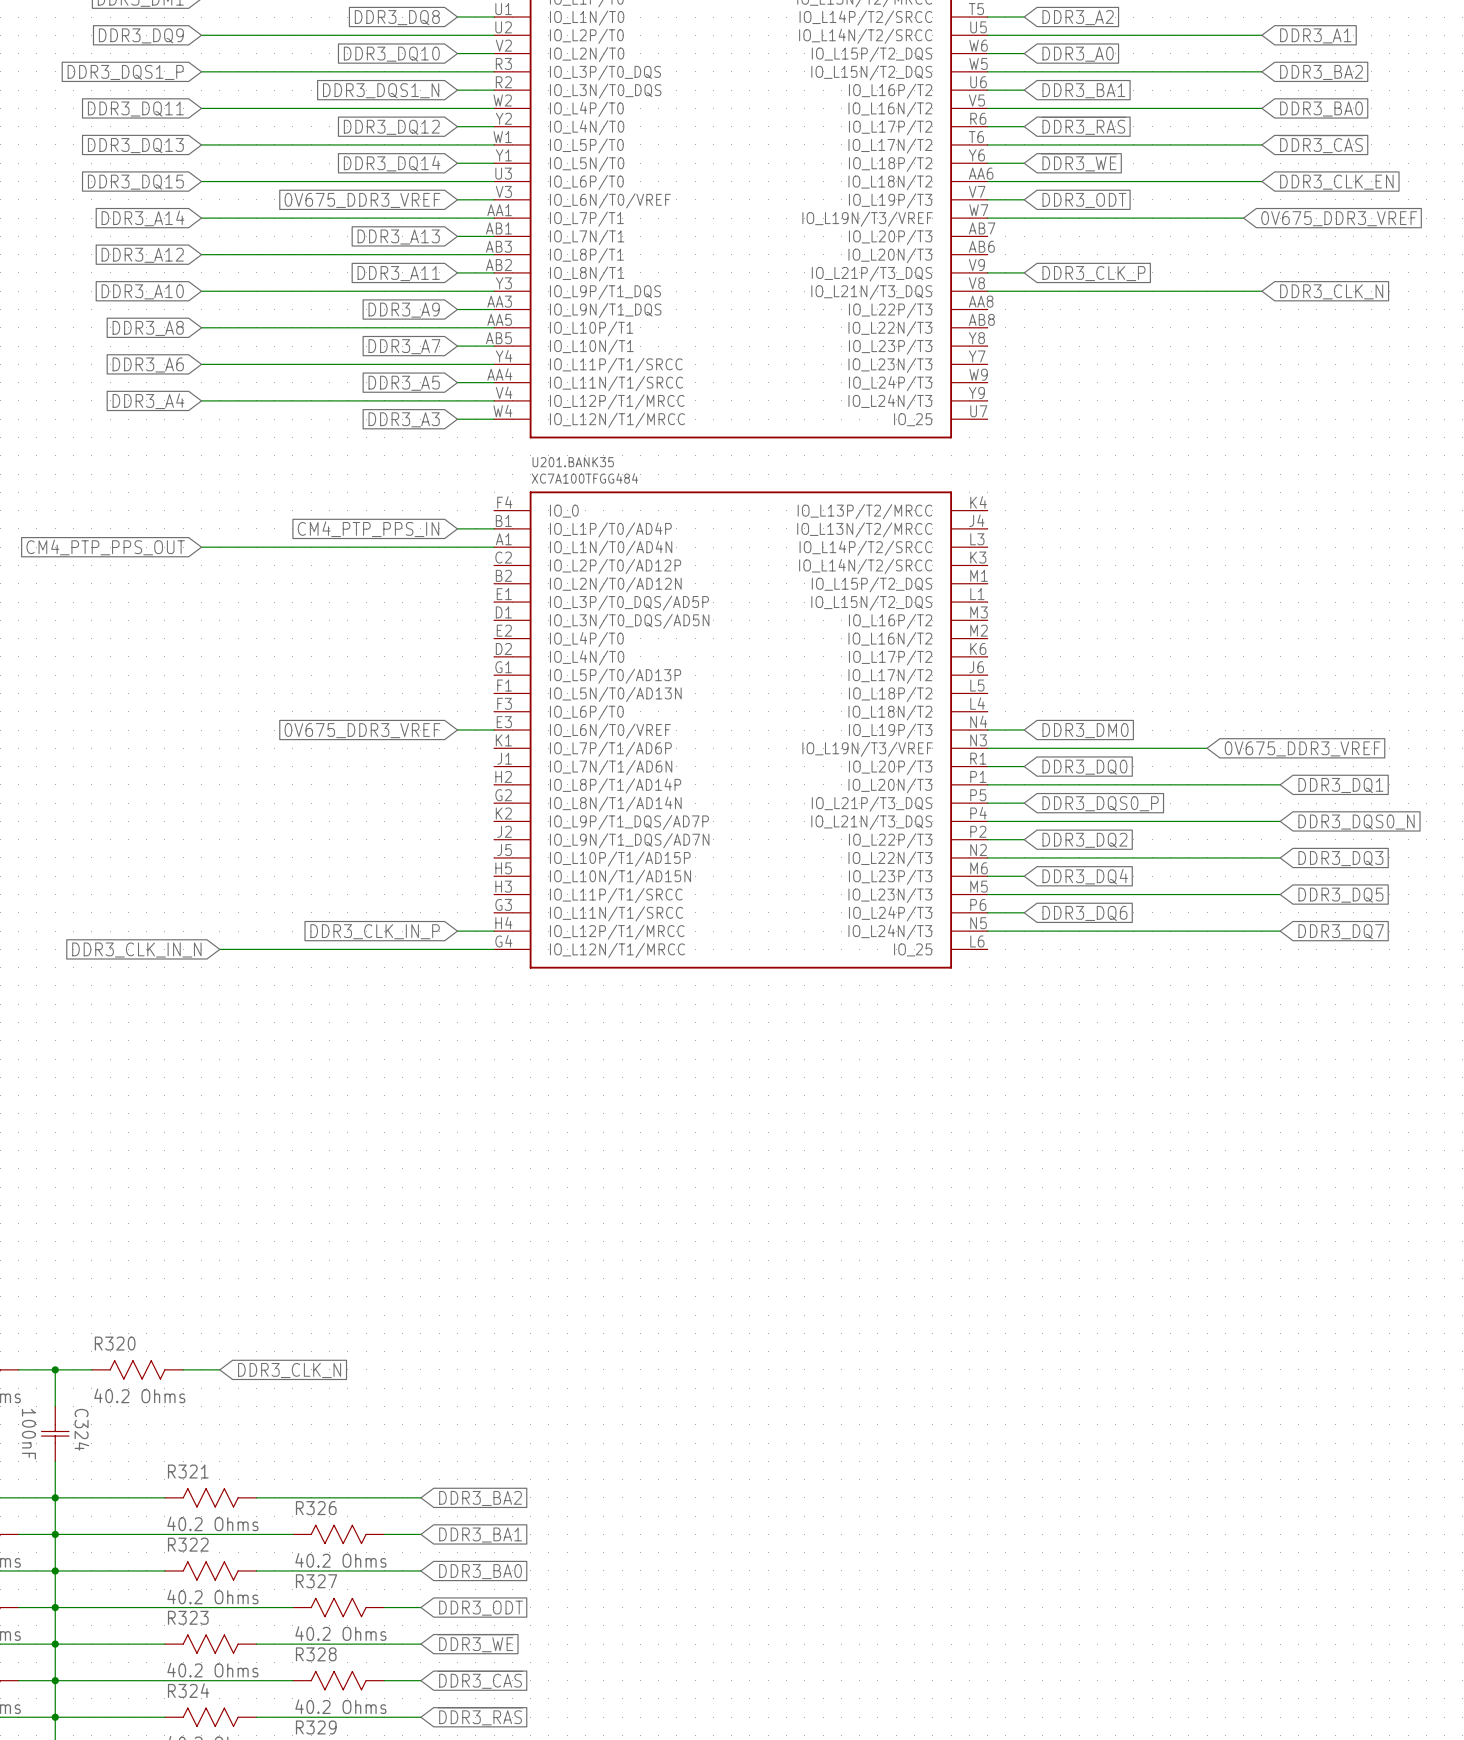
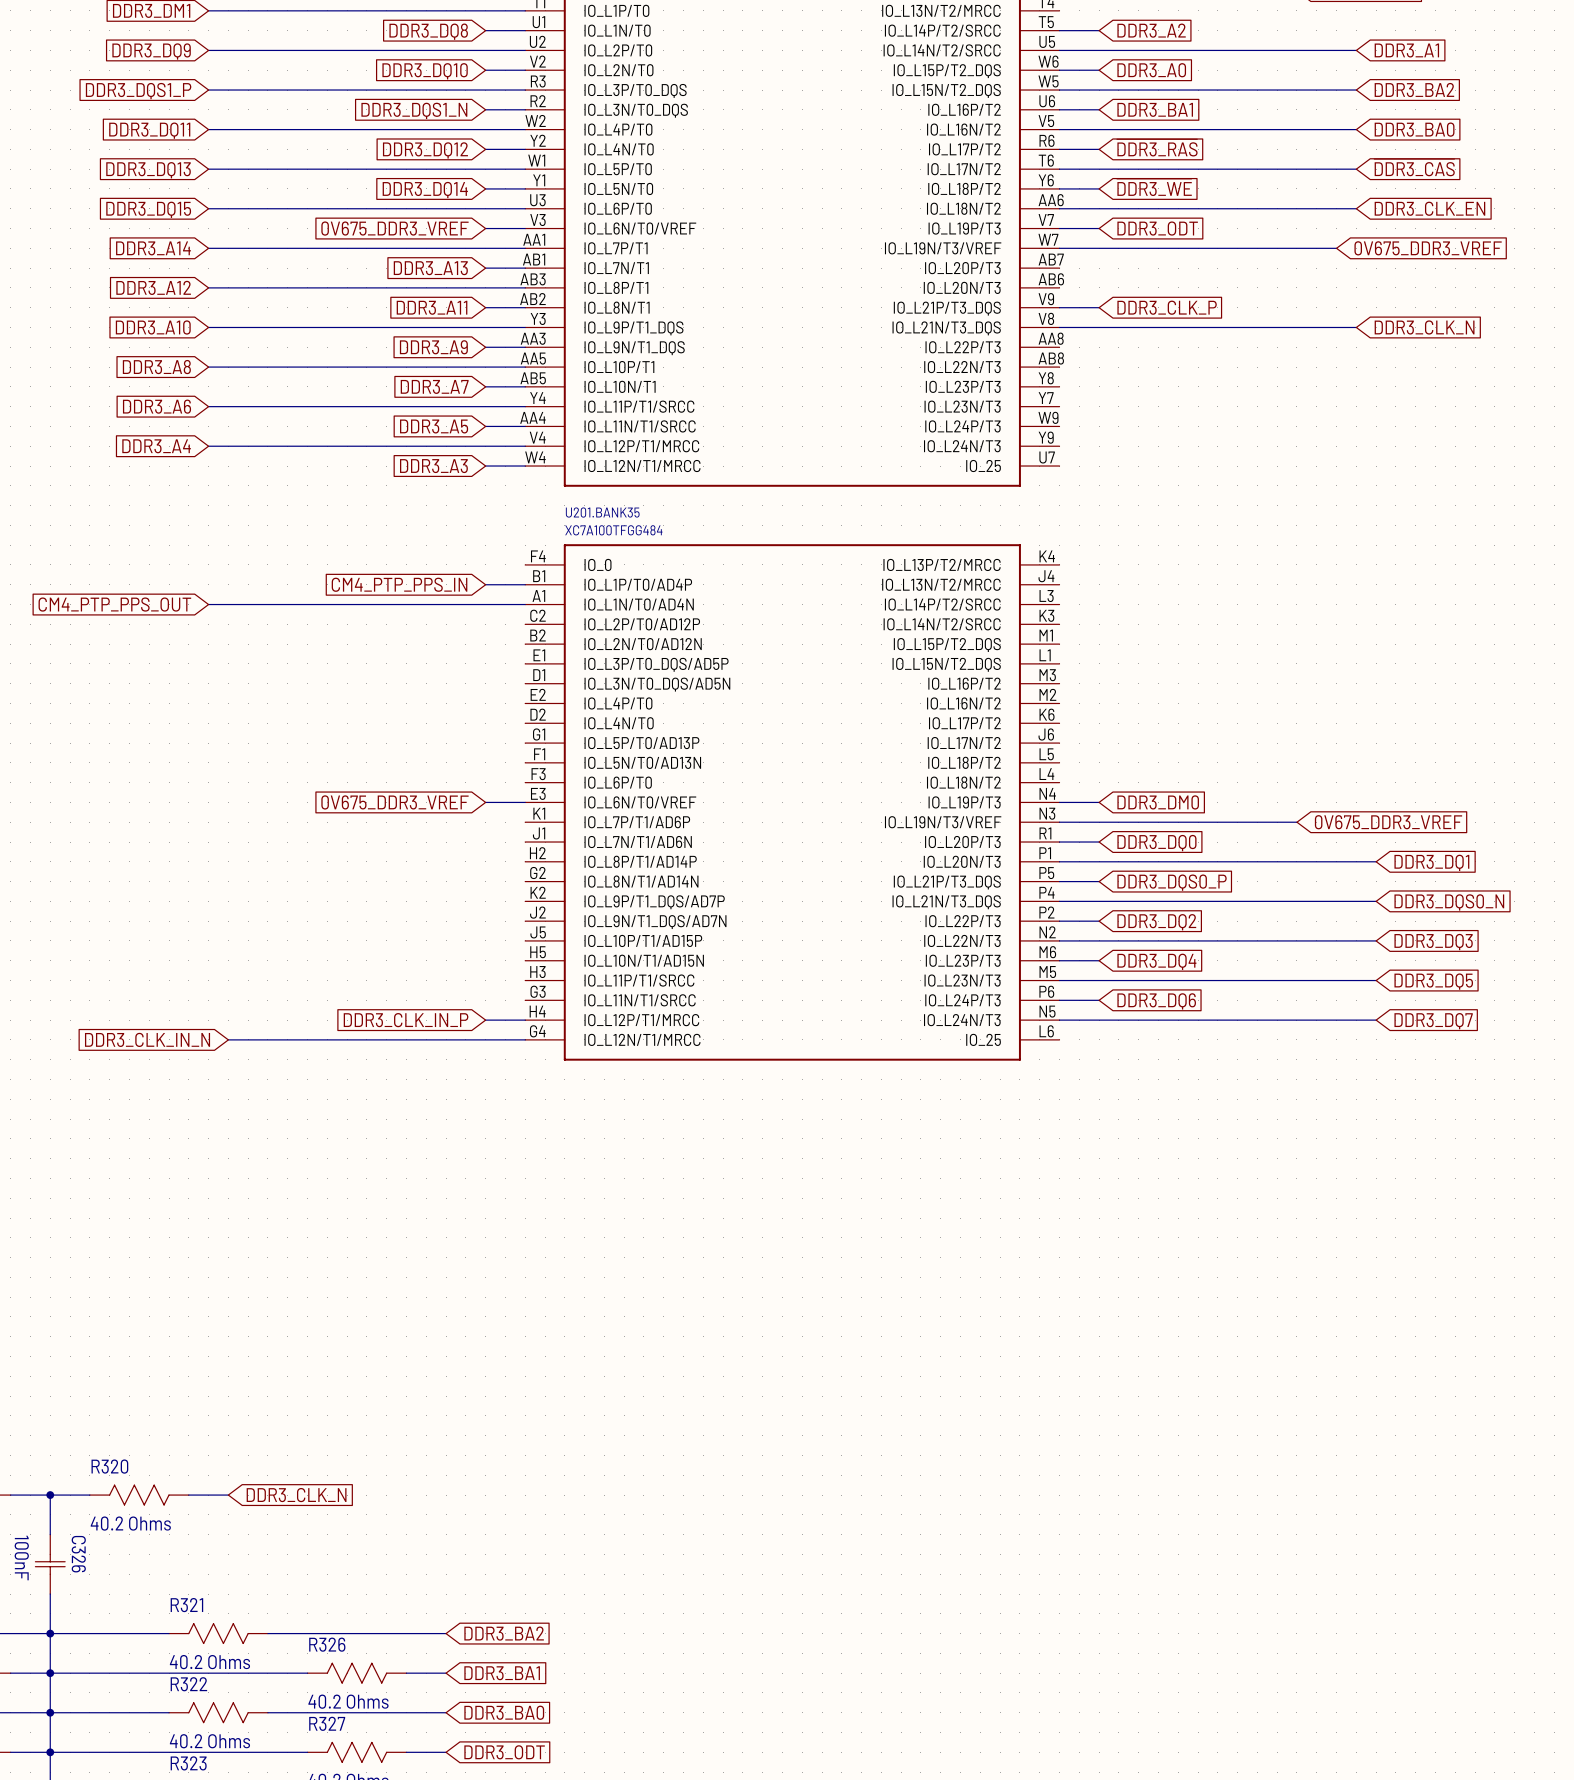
C324 name: C324 (81, 1429) -> C326 (78, 1554)

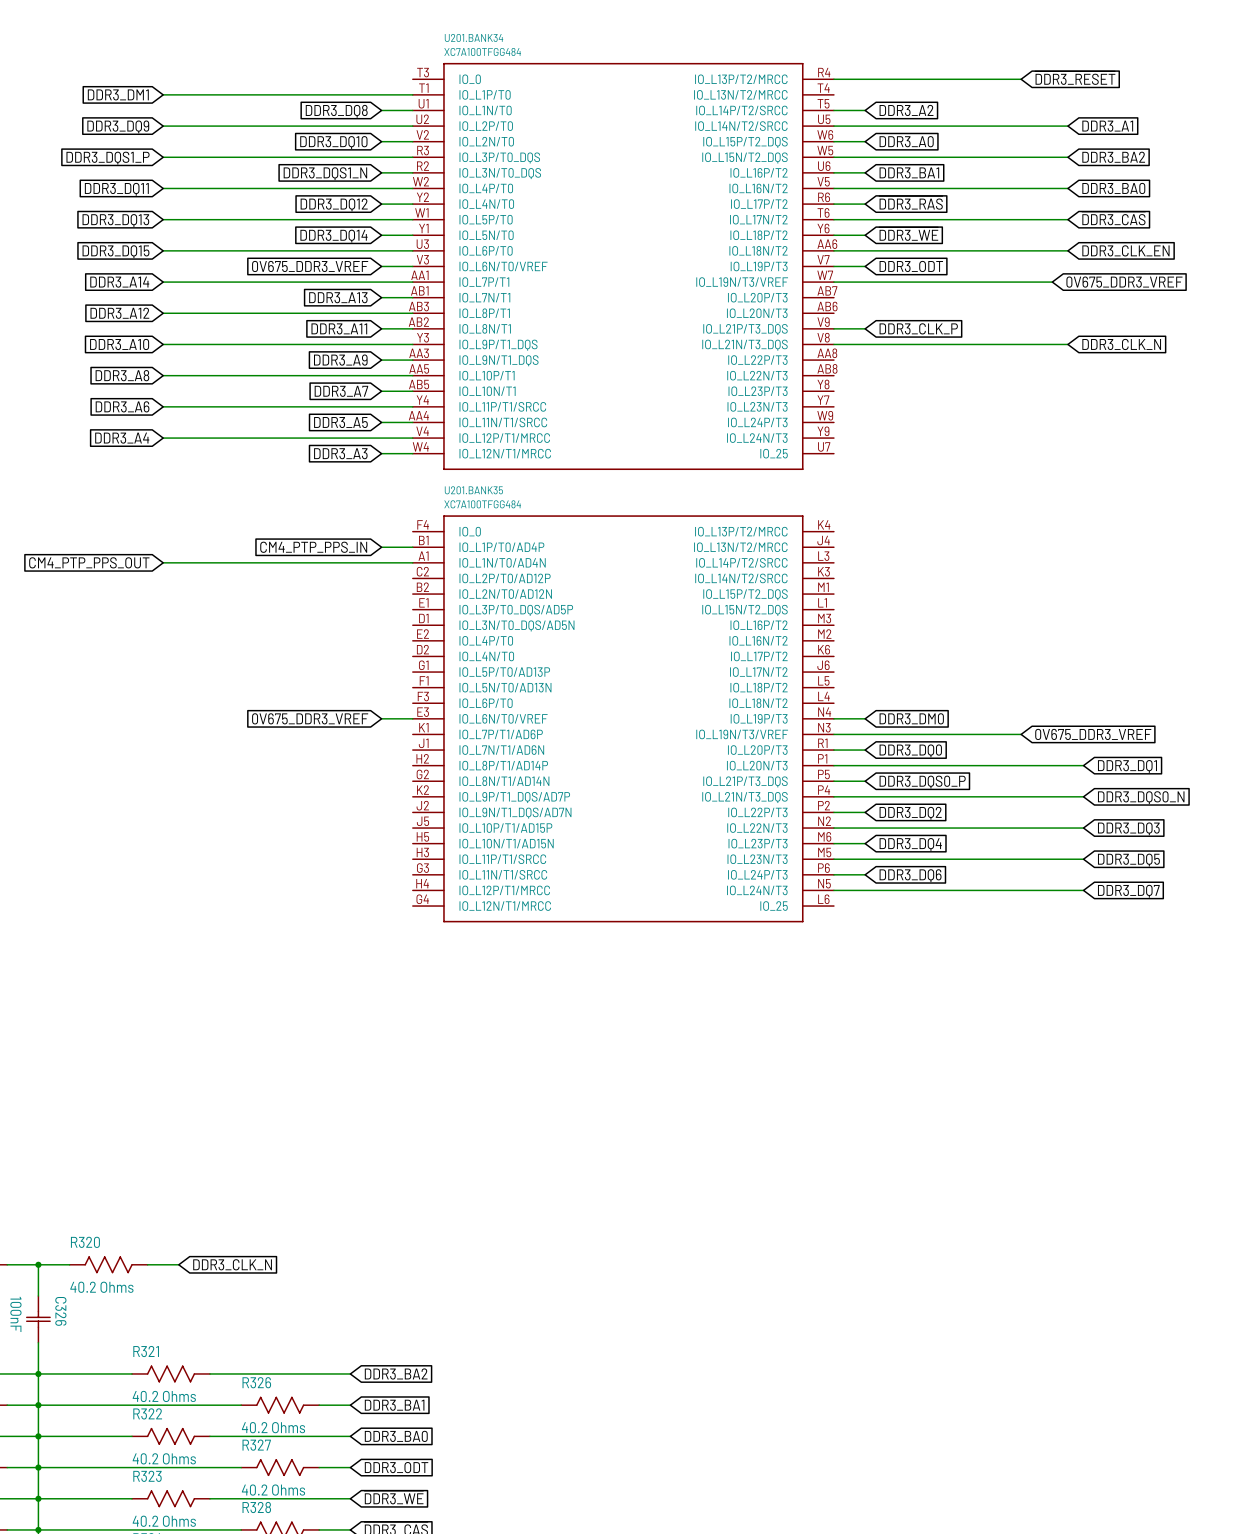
global label: DDR3_CLK_IN_P (406, 1020) -> none
wire: (485, 1020) (525, 1020) -> none
global label: DDR3_CLK_IN_N (147, 1039) -> none
wire: (228, 1039) (525, 1039) -> none

